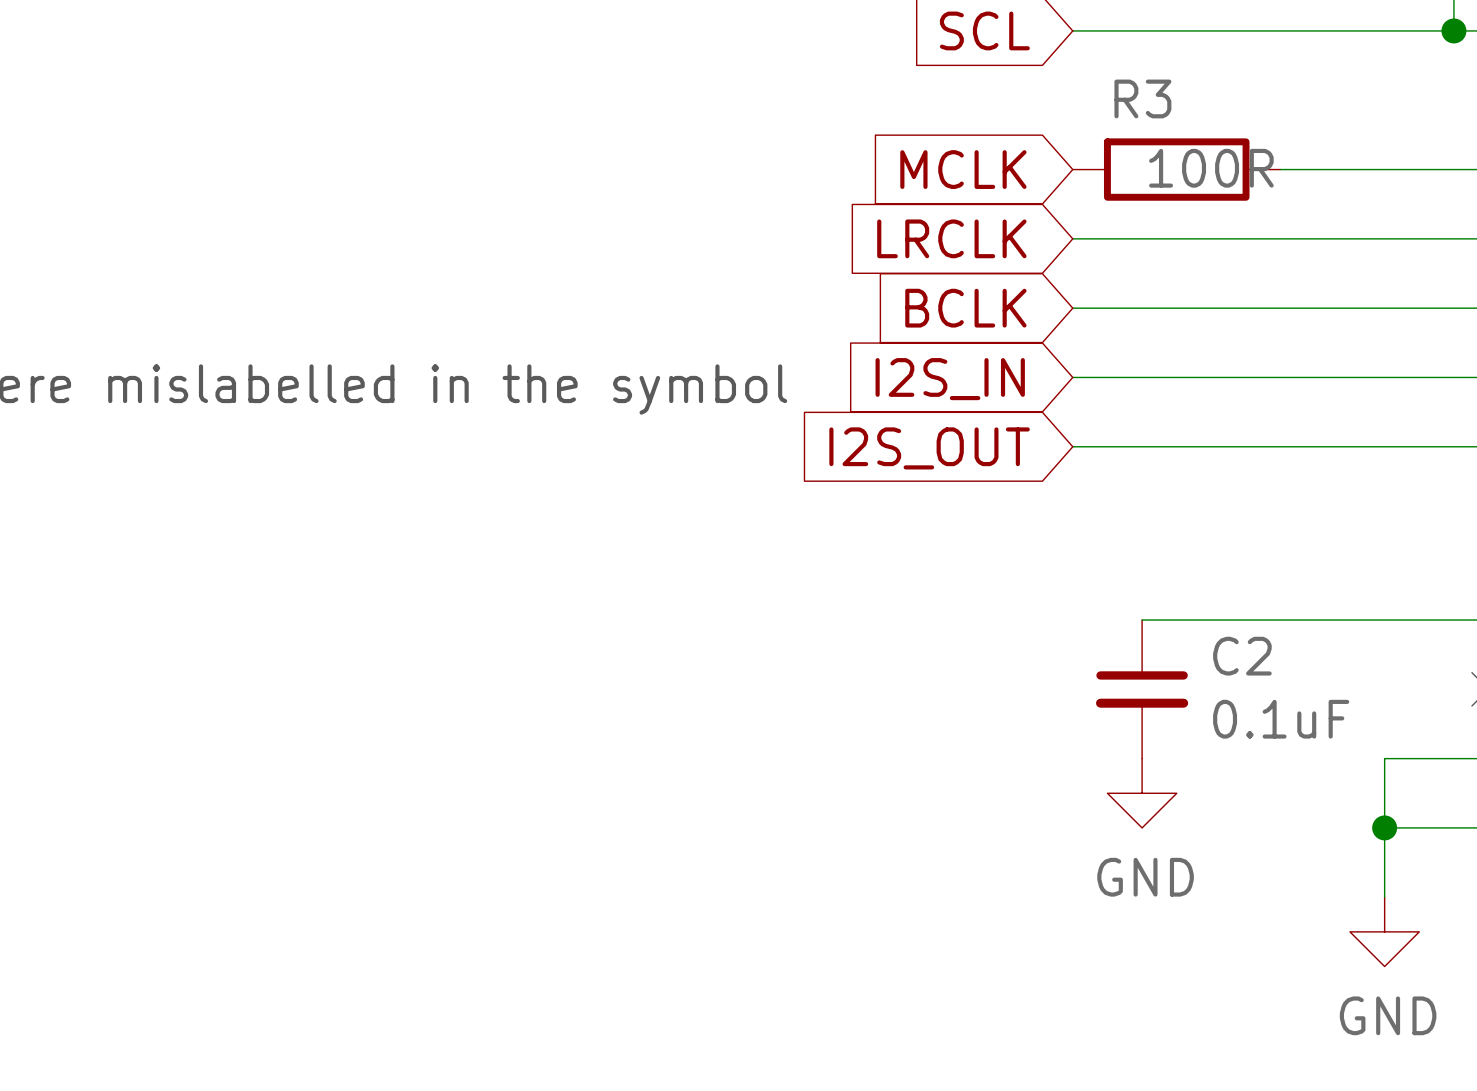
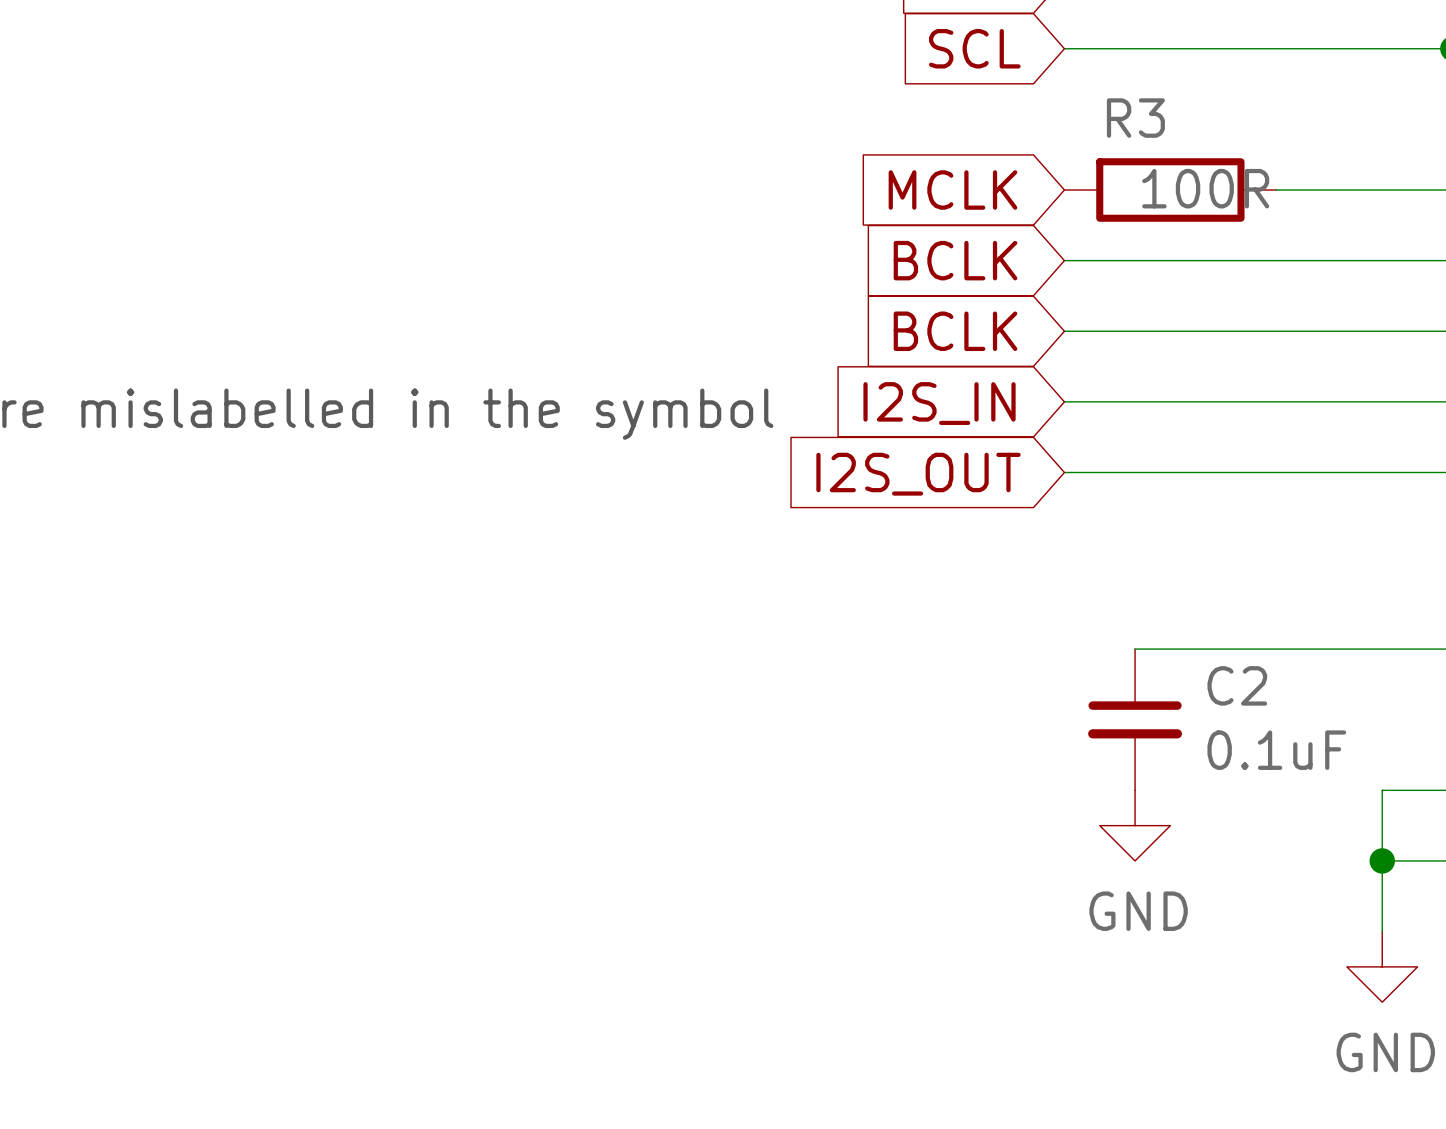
global label: LRCLK (951, 238) -> BCLK (955, 260)

